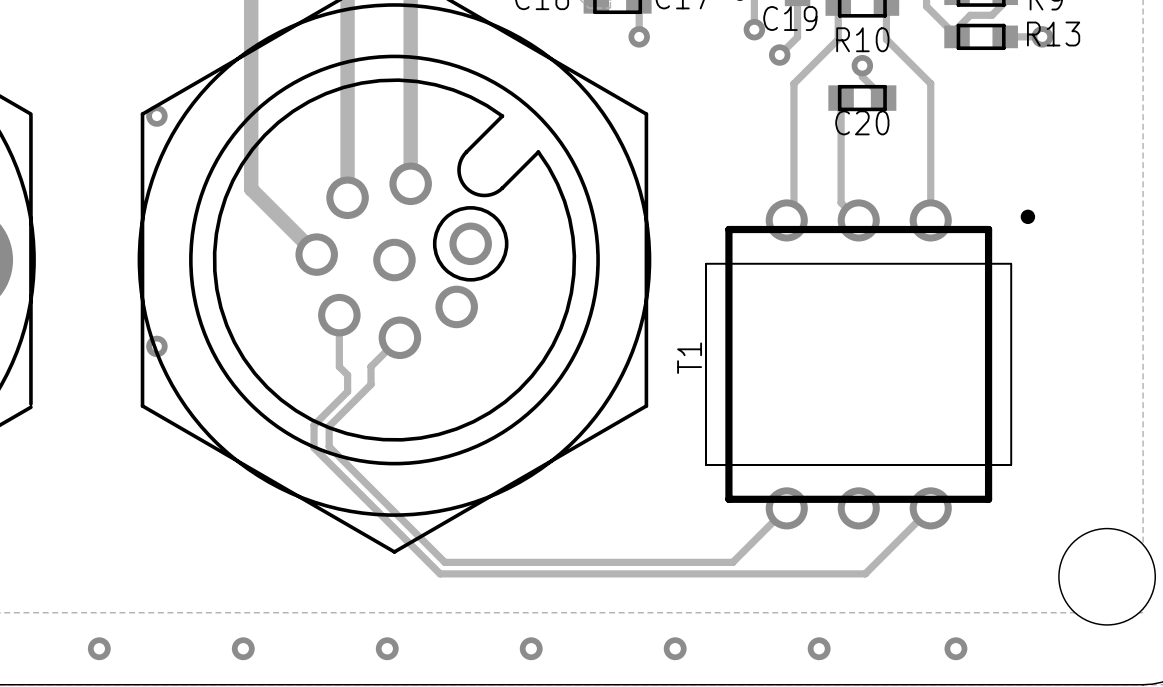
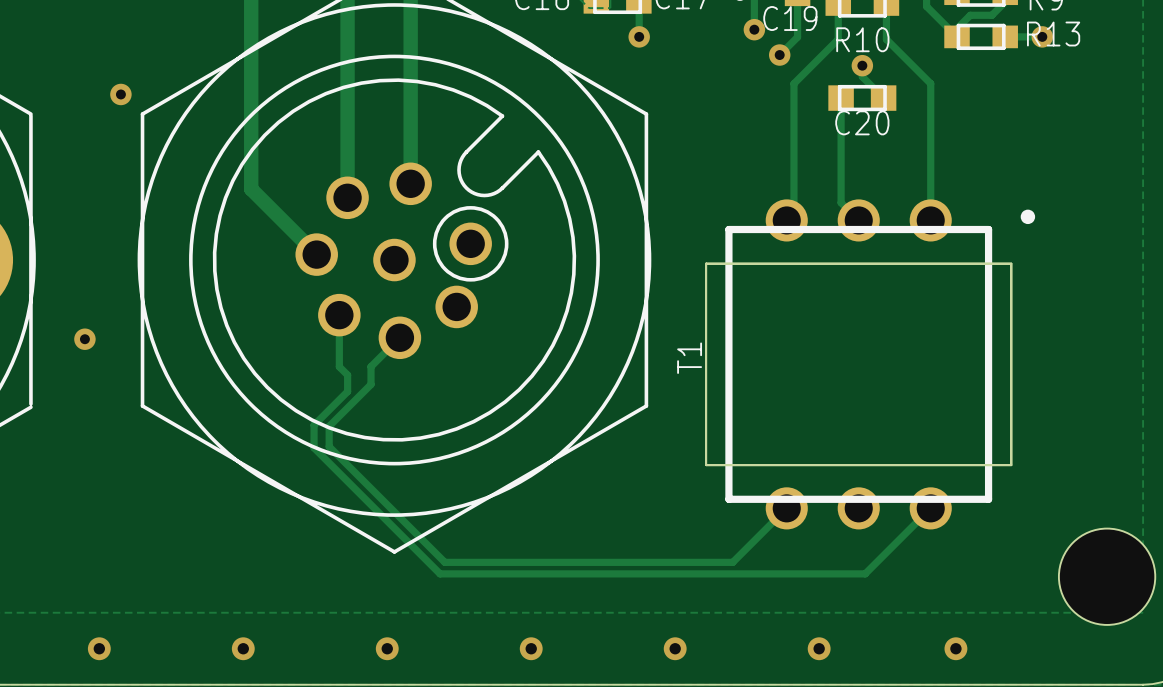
via position: (156, 116) -> (120, 94)
via position: (156, 346) -> (84, 339)

